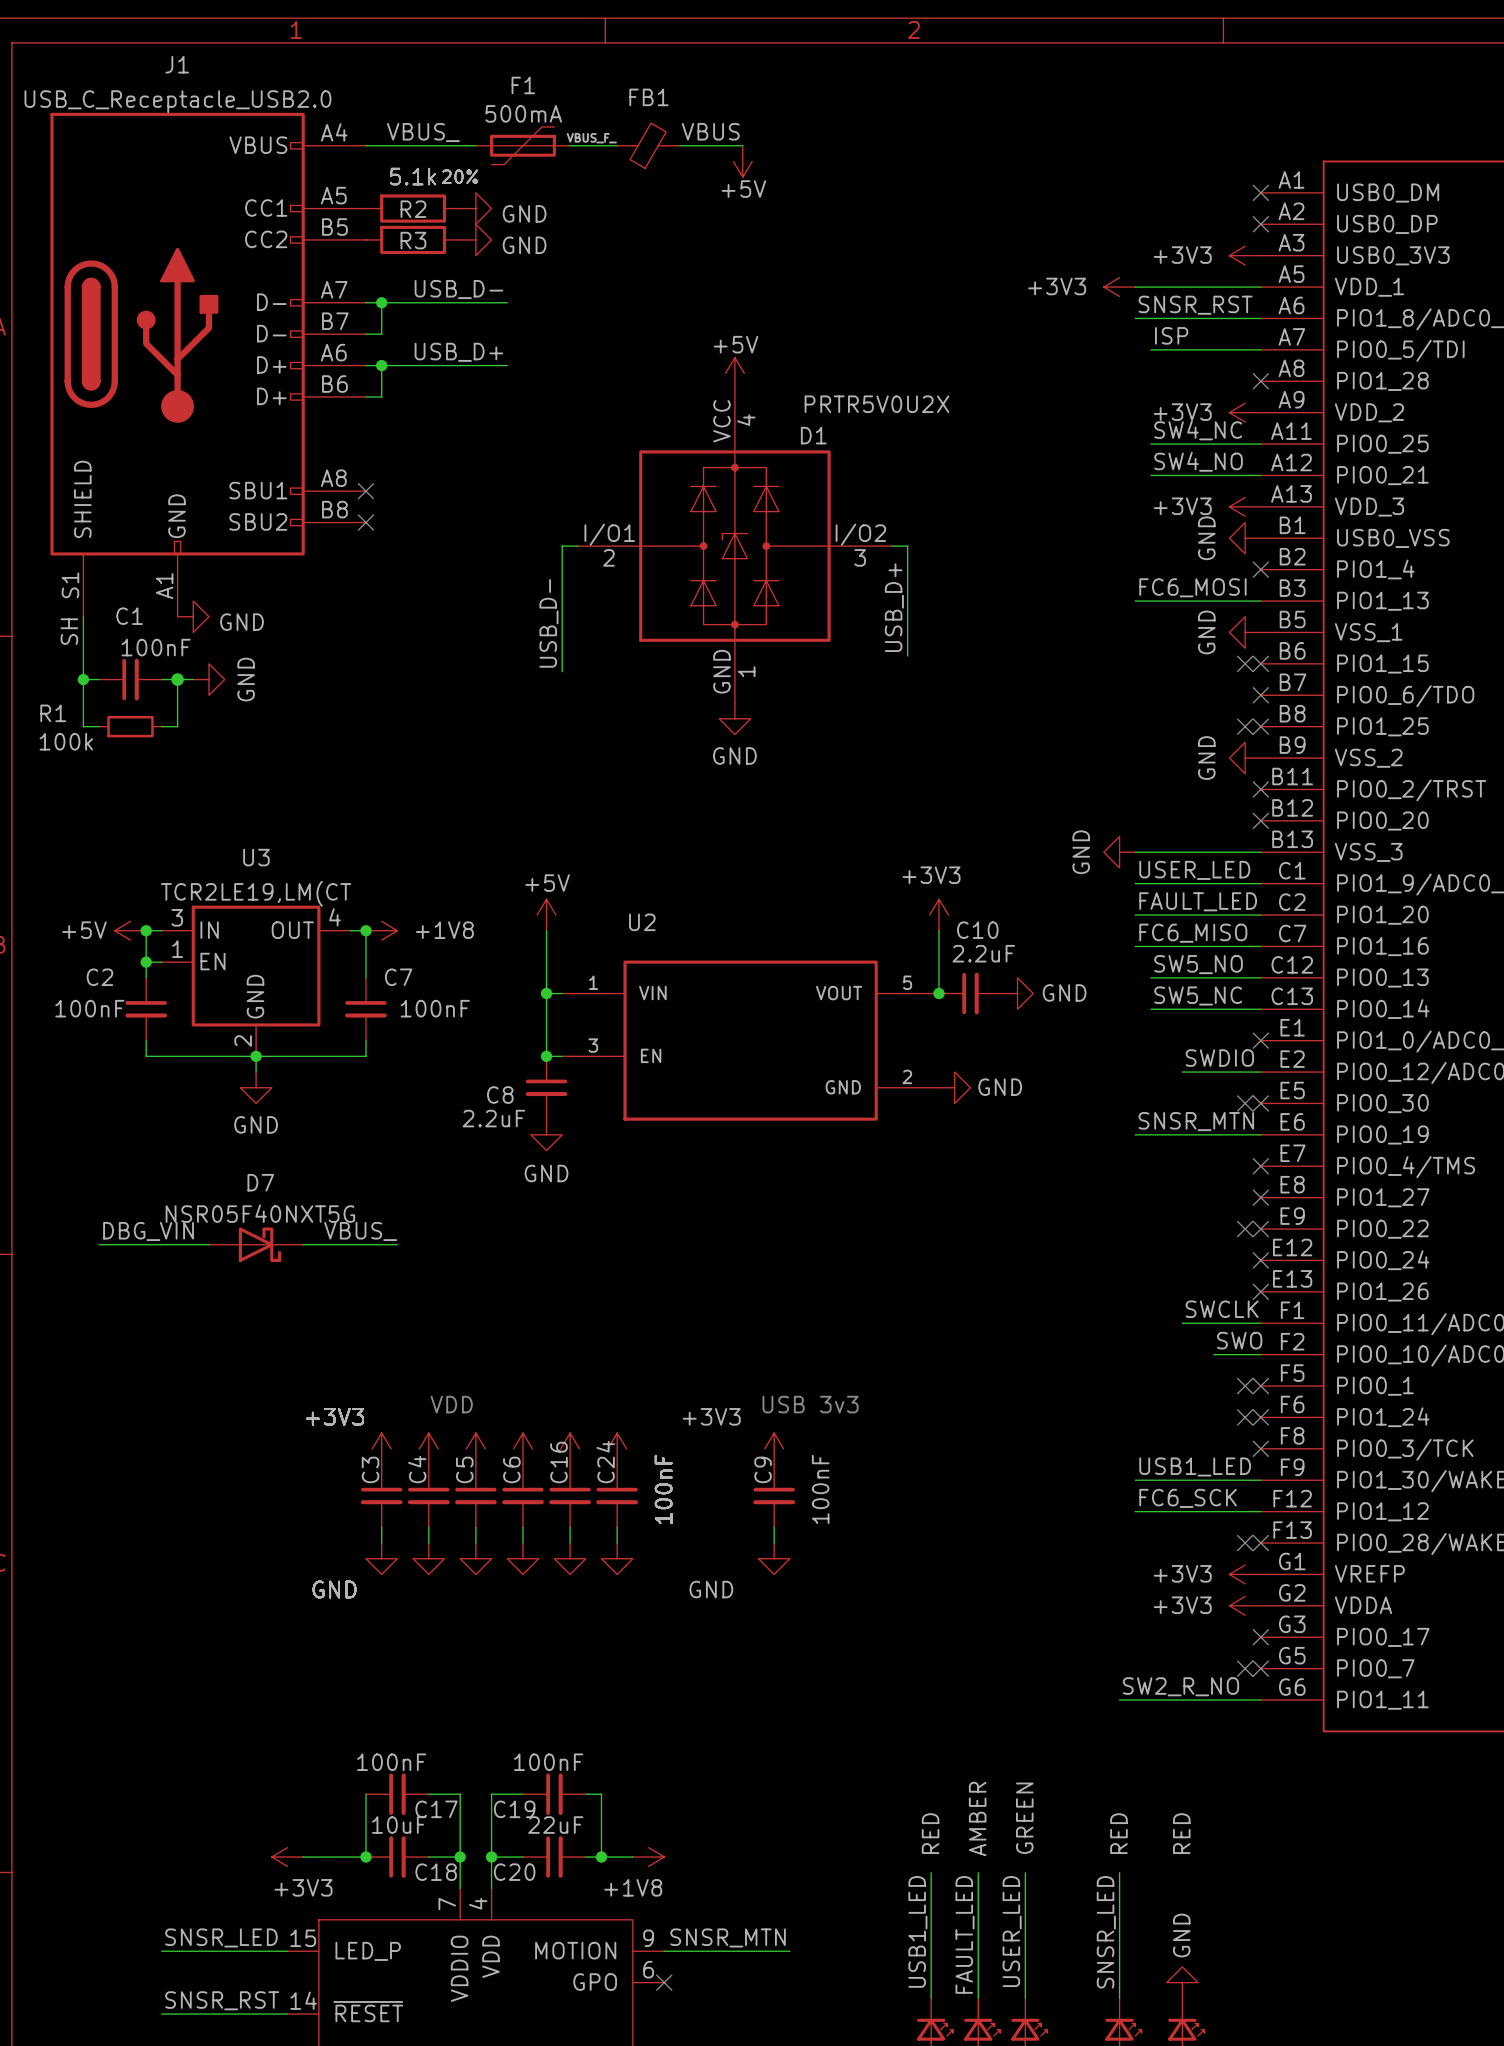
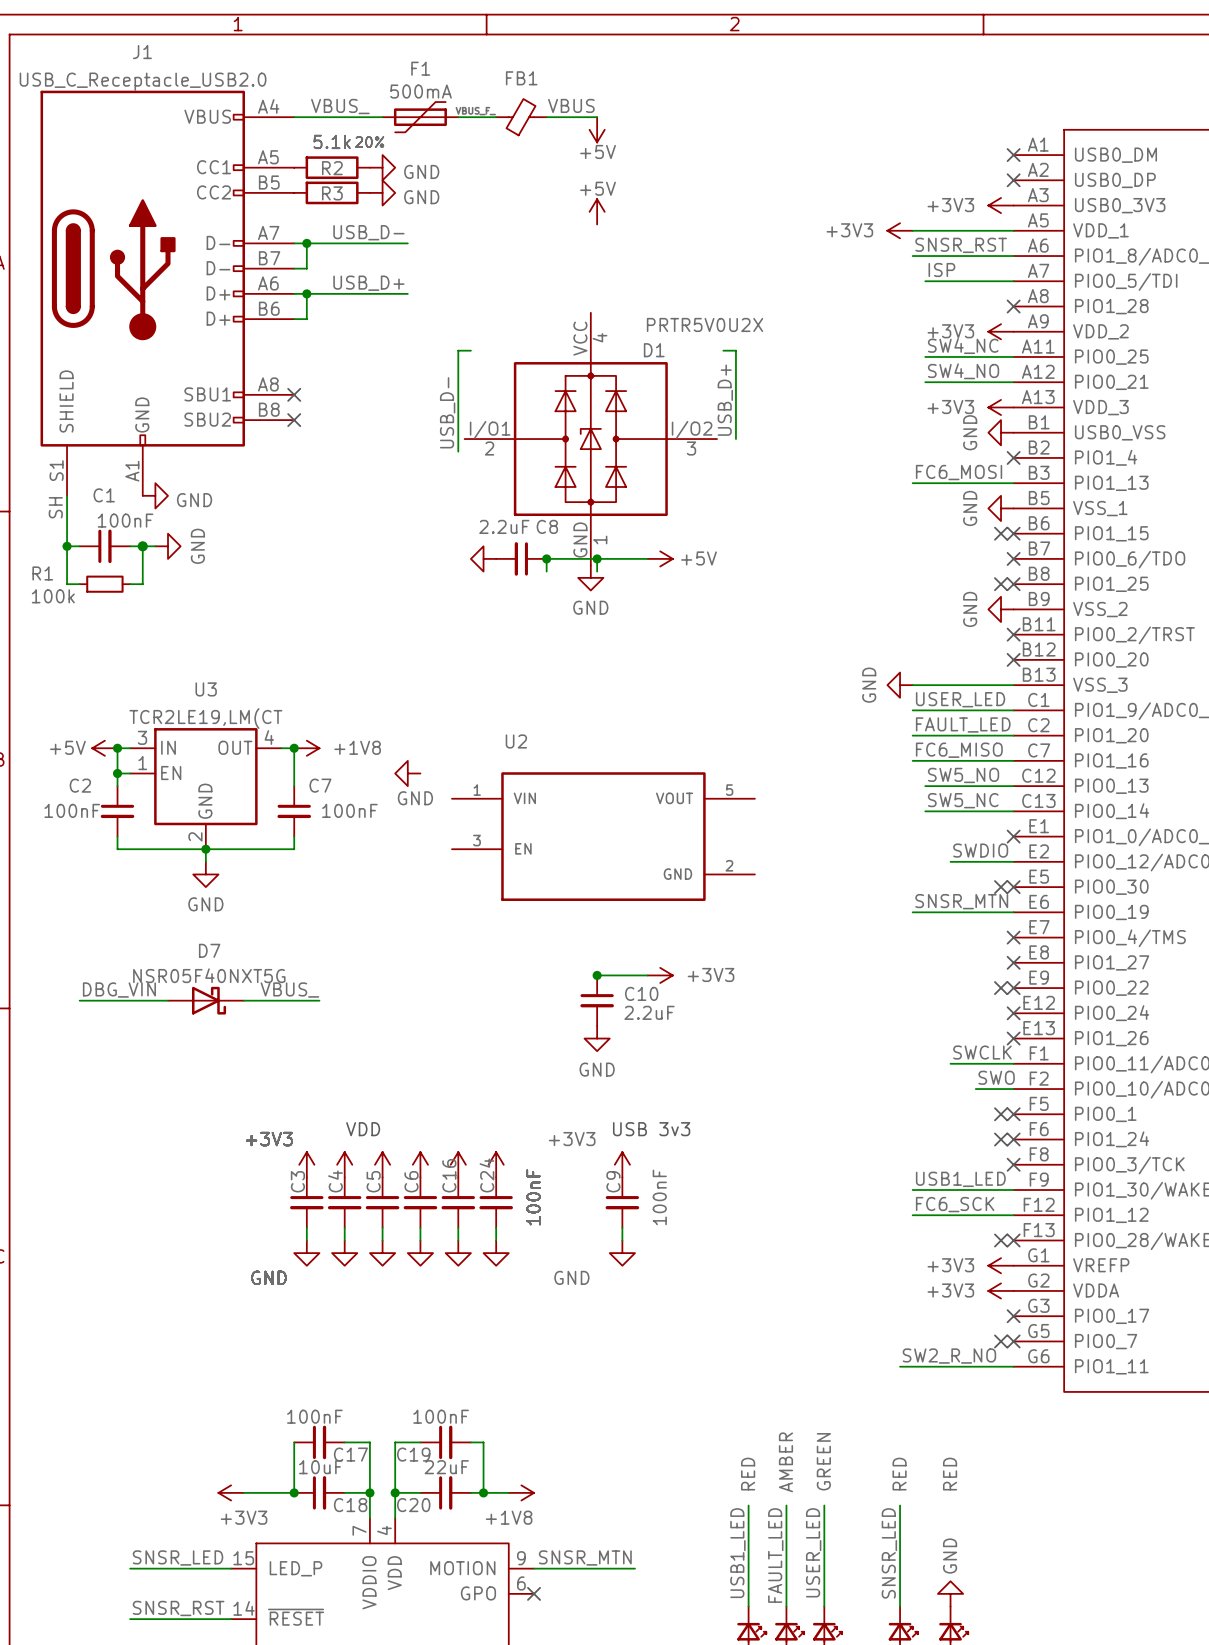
power symbol position: +5V (734, 373) -> +5V (597, 211)
wire: (577, 546) (562, 546) (562, 671) -> (470, 350) (458, 350) (458, 451)
wire: (891, 546) (907, 546) (907, 656) -> (723, 350) (735, 350) (735, 439)
label position: USB_D+ (894, 607) -> USB_D+ (725, 400)
label position: USB_D- (548, 623) -> USB_D- (447, 412)
power symbol: none -> (483, 558)
junction: none -> (546, 558)
wire: none -> (597, 558) (597, 571)
junction: none -> (597, 558)
wire: none -> (647, 558) (546, 558) (546, 571)
power symbol: none -> +5V (660, 558)
power symbol: +5V (546, 915) -> none
power symbol: +3V3 (939, 915) -> none
wire: (546, 930) (546, 1056) (562, 1056) -> none
wire: (939, 930) (939, 993) -> none
C10 value position: 2.2uF (983, 953) -> 2.2uF (649, 1012)
power symbol: none -> GND (407, 773)
wire: (546, 993) (562, 993) -> none
junction: (546, 993) -> none
junction: (939, 993) -> none
C10 rotation: 0° (970, 993) -> 90° clockwise (597, 1000)
C10 position: (970, 993) -> (597, 1000)
power symbol: GND (1017, 993) -> none
junction: (546, 1056) -> none
C8 rotation: 0° (546, 1087) -> 90° clockwise (521, 558)
C8 position: (546, 1087) -> (521, 558)
power symbol: GND (954, 1087) -> none
C8 name position: C8 (500, 1095) -> C8 (547, 526)
power symbol: GND (546, 1134) -> none
wire: none -> (597, 975) (647, 975)
junction: none -> (597, 975)
power symbol: none -> +3V3 (660, 975)
power symbol: none -> GND (597, 1038)

